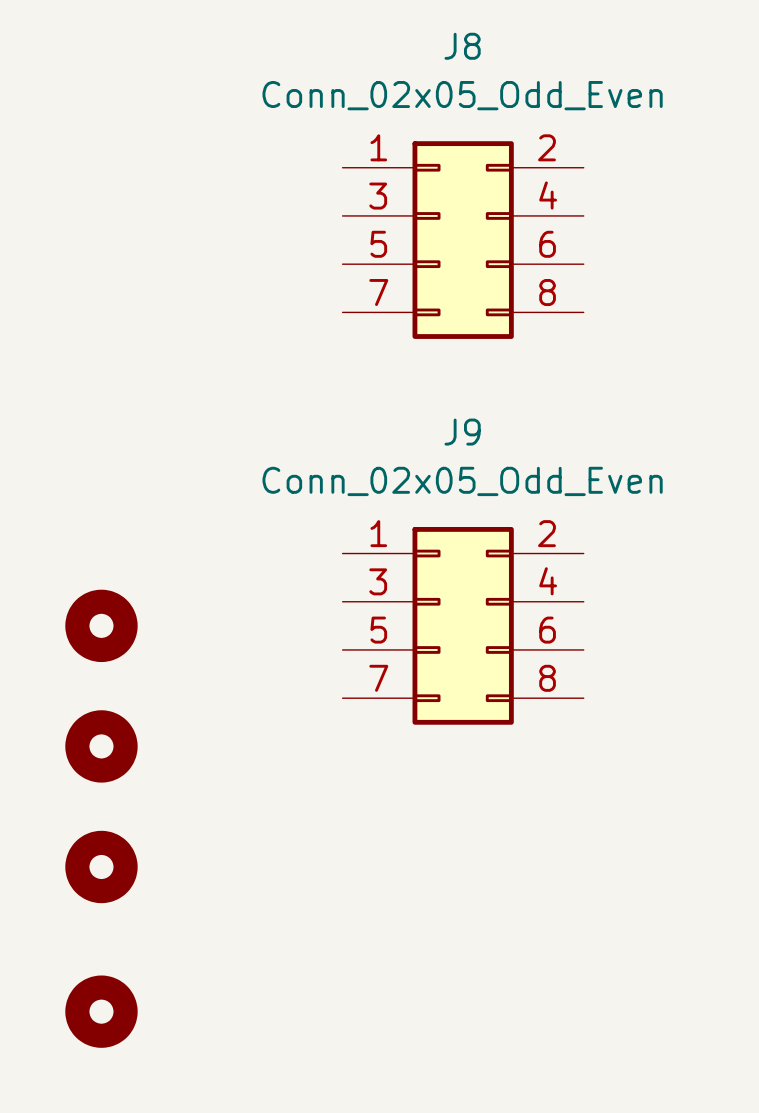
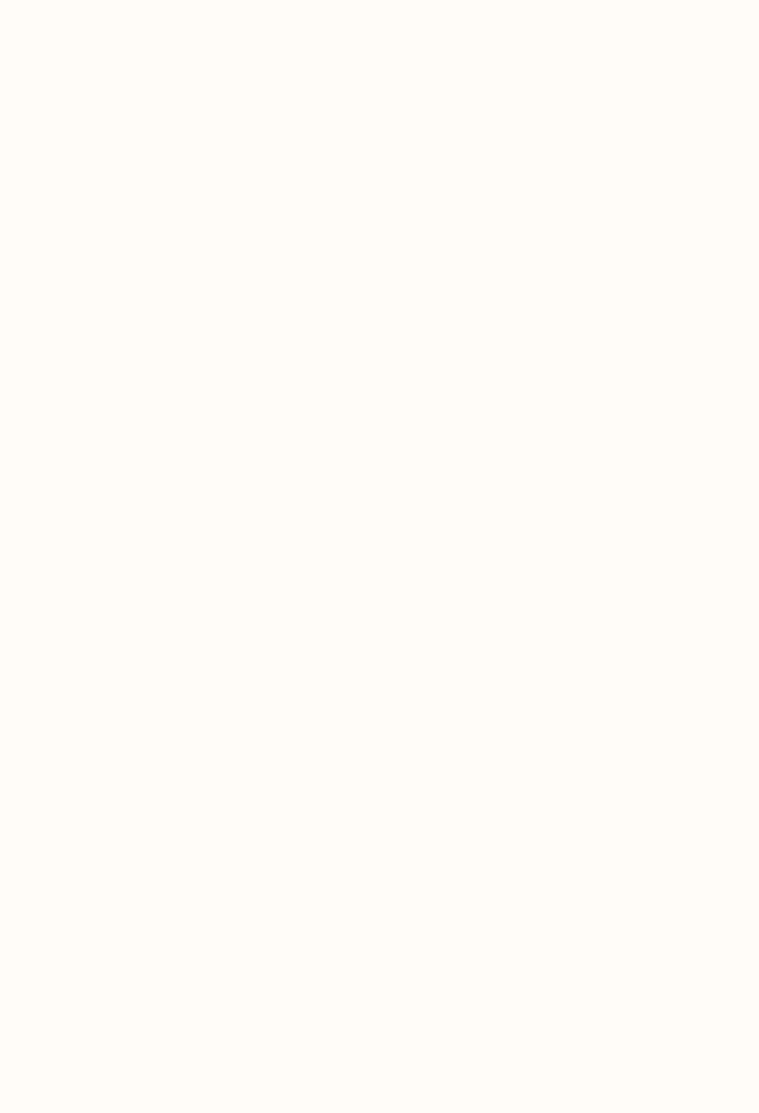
J8: Conn_02x05_Odd_Even (463, 240) -> none
part: (101, 625) -> none
J9: Conn_02x05_Odd_Even (463, 625) -> none
part: (101, 746) -> none
part: (101, 866) -> none
part: (101, 1011) -> none

